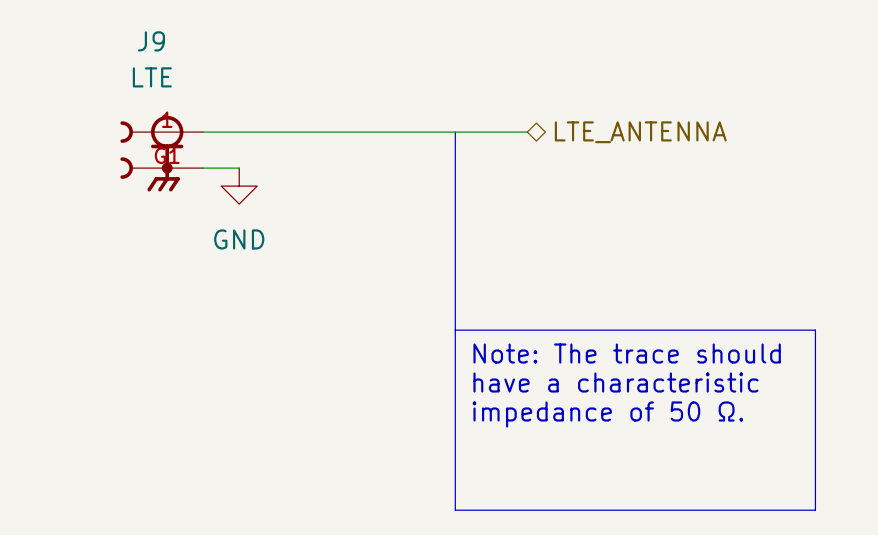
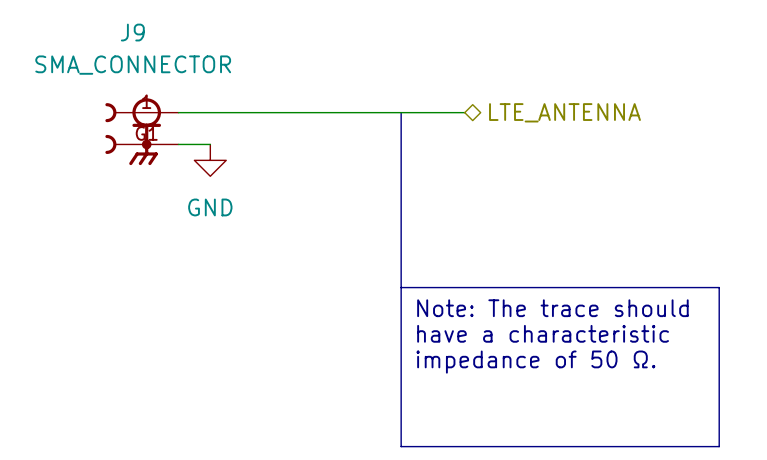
J9 value: LTE (152, 77) -> SMA_CONNECTOR (133, 65)

